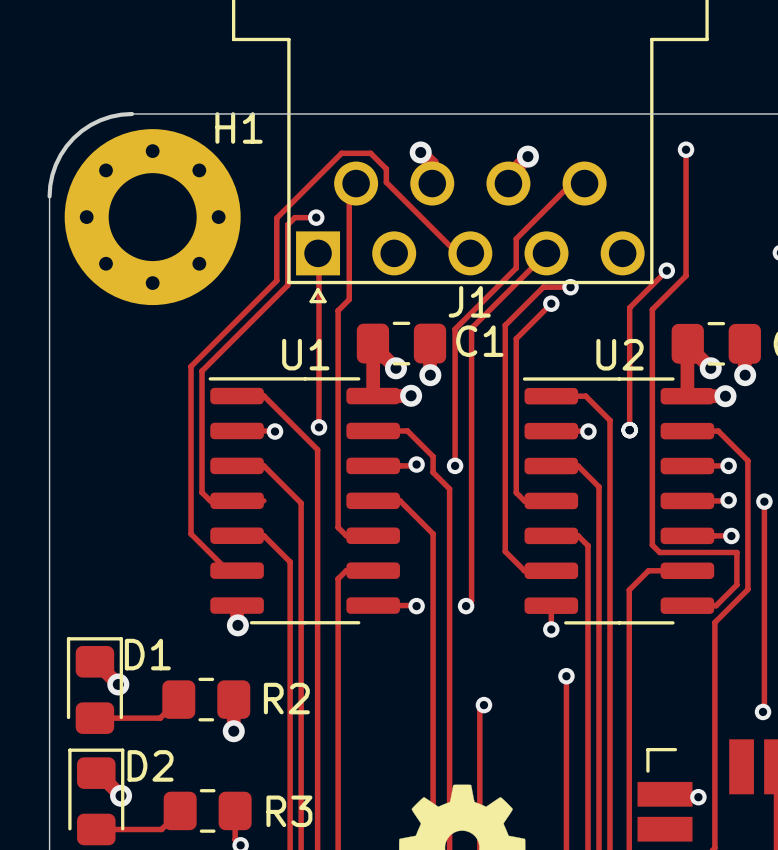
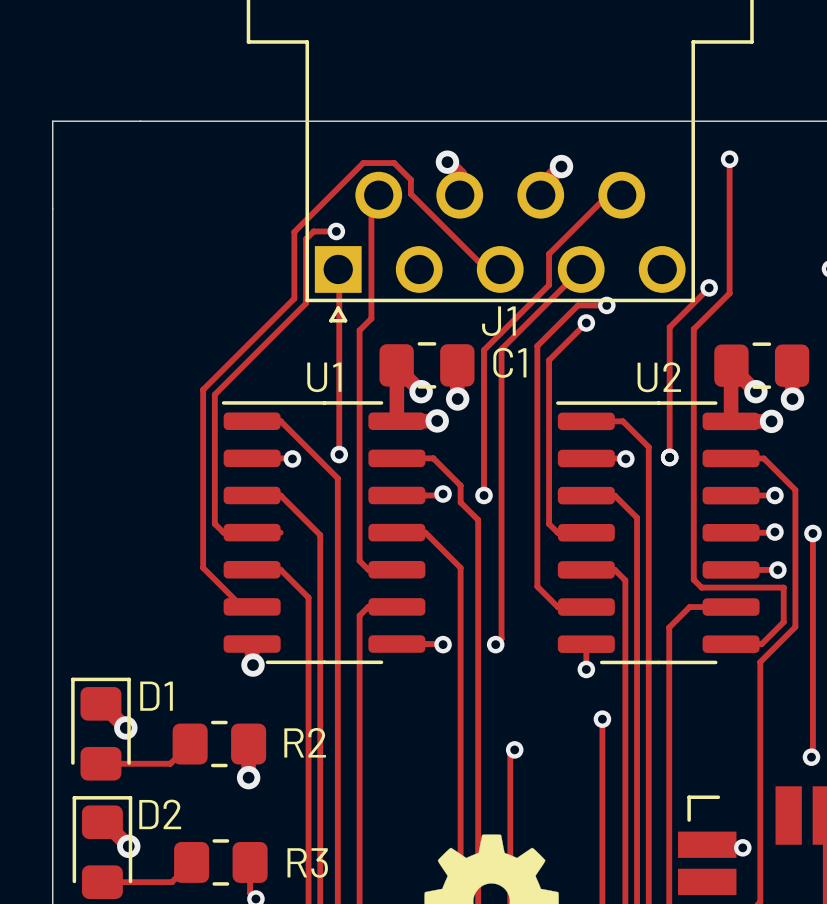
board edge: (132, 113) (100, 120) (73, 138) (55, 164) (49, 196) -> (140, 121) (52, 121) (52, 208)
H1: (152, 217) -> none

